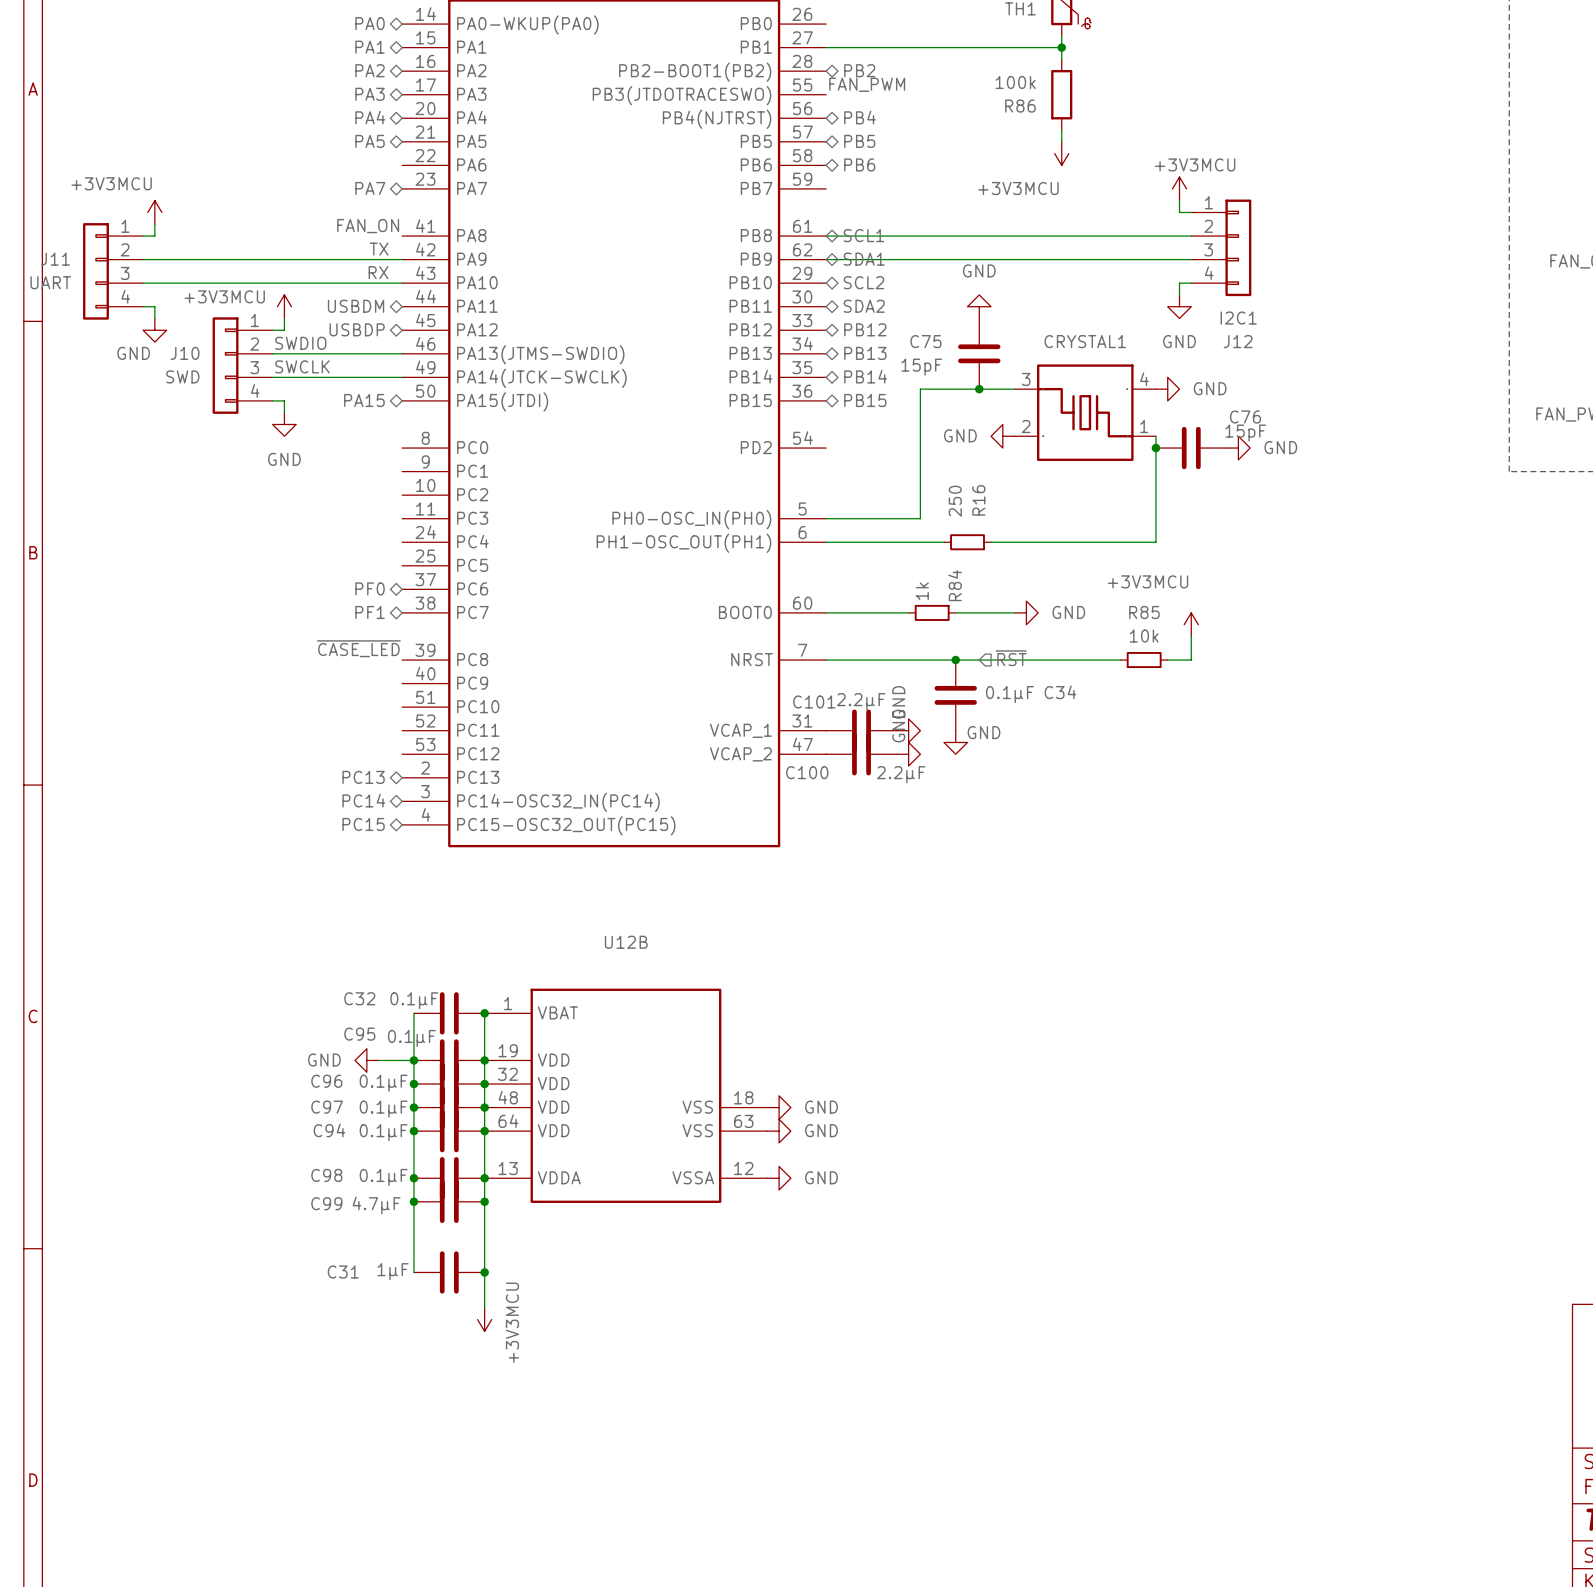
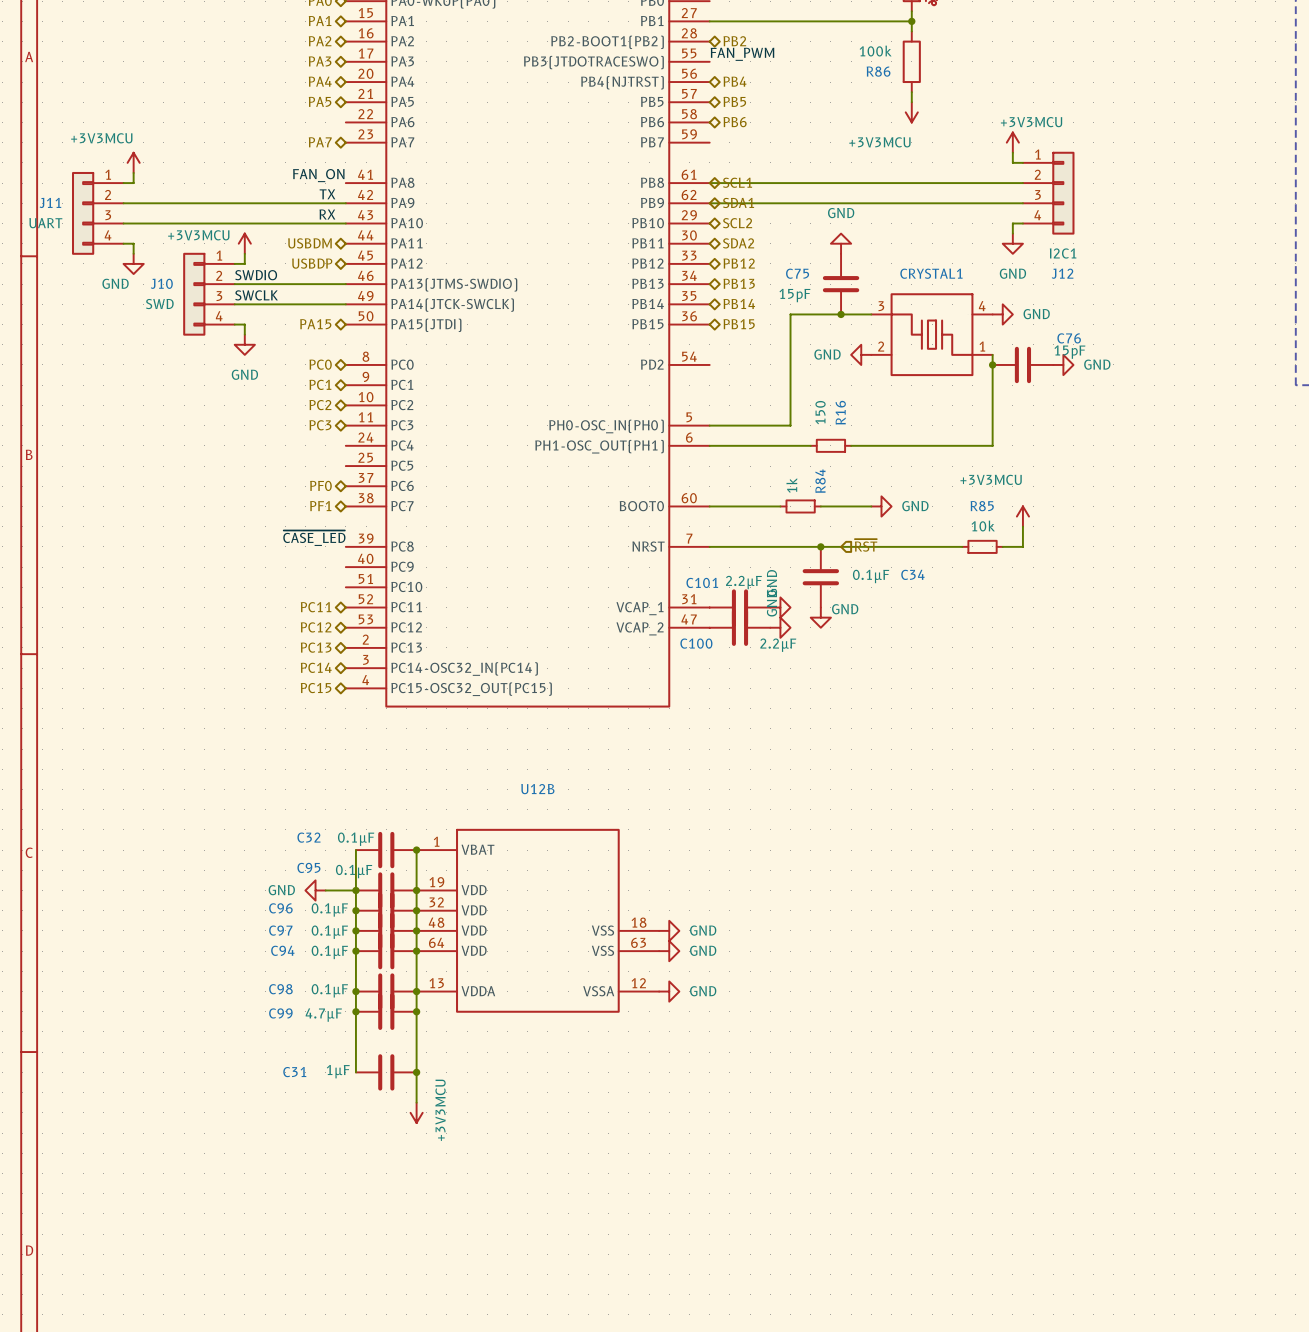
hierarchical label: none -> PC0 (320, 364)
hierarchical label: none -> PC1 (320, 384)
hierarchical label: none -> PC2 (320, 405)
R16 value: 250 (955, 501) -> 150 (820, 412)
hierarchical label: none -> PC3 (320, 425)
hierarchical label: none -> PC11 (316, 607)
hierarchical label: none -> PC12 (316, 627)

